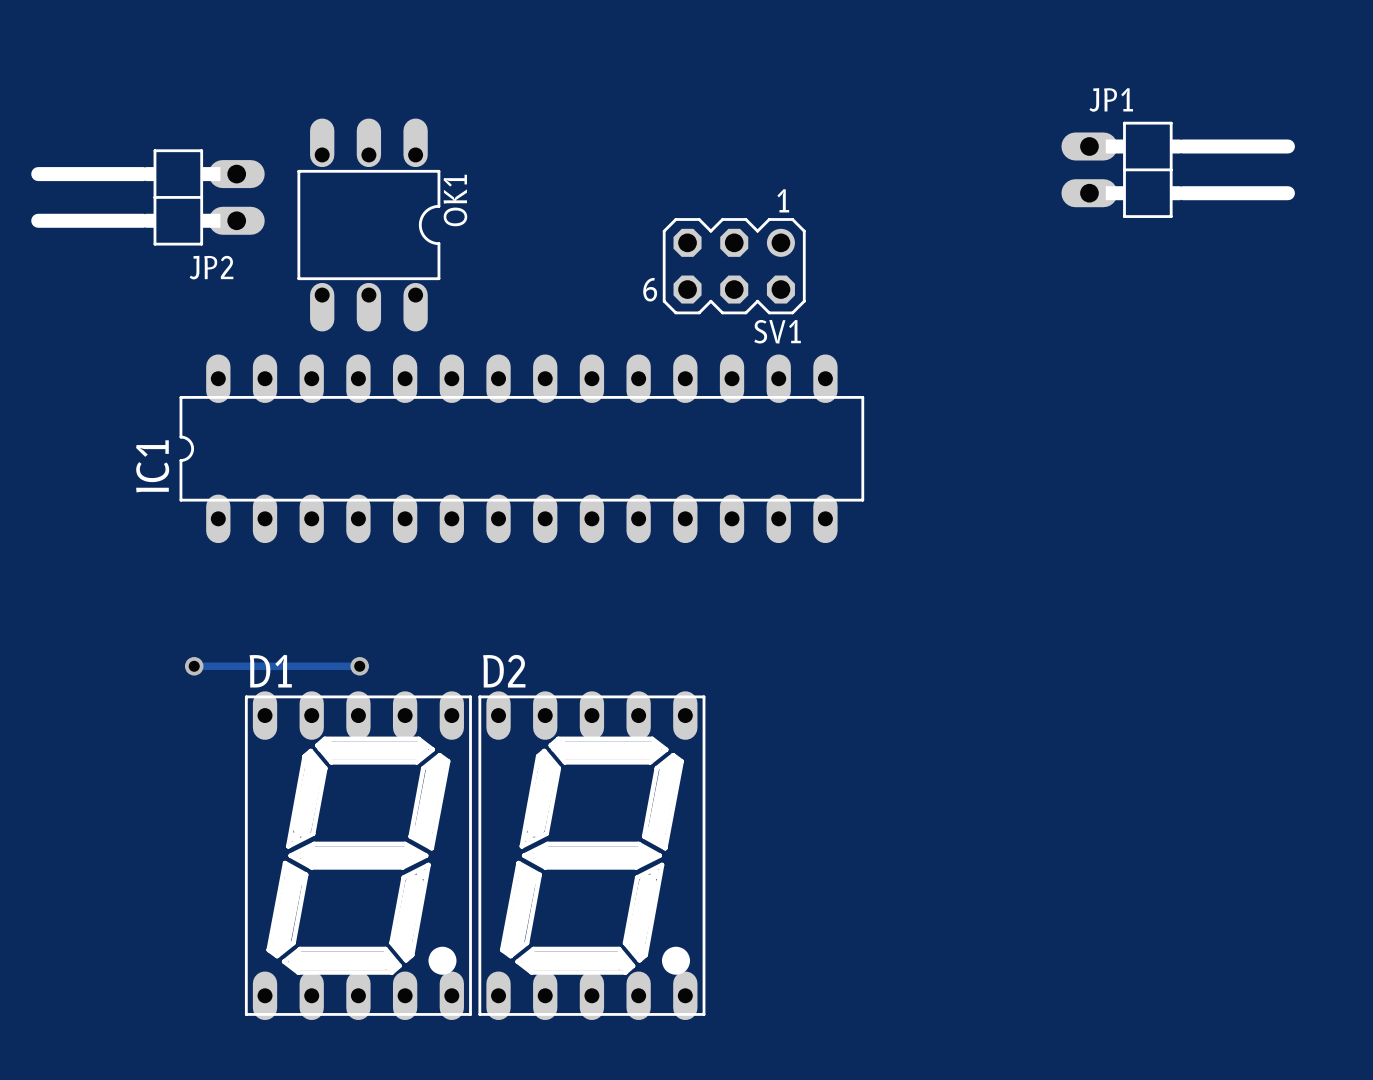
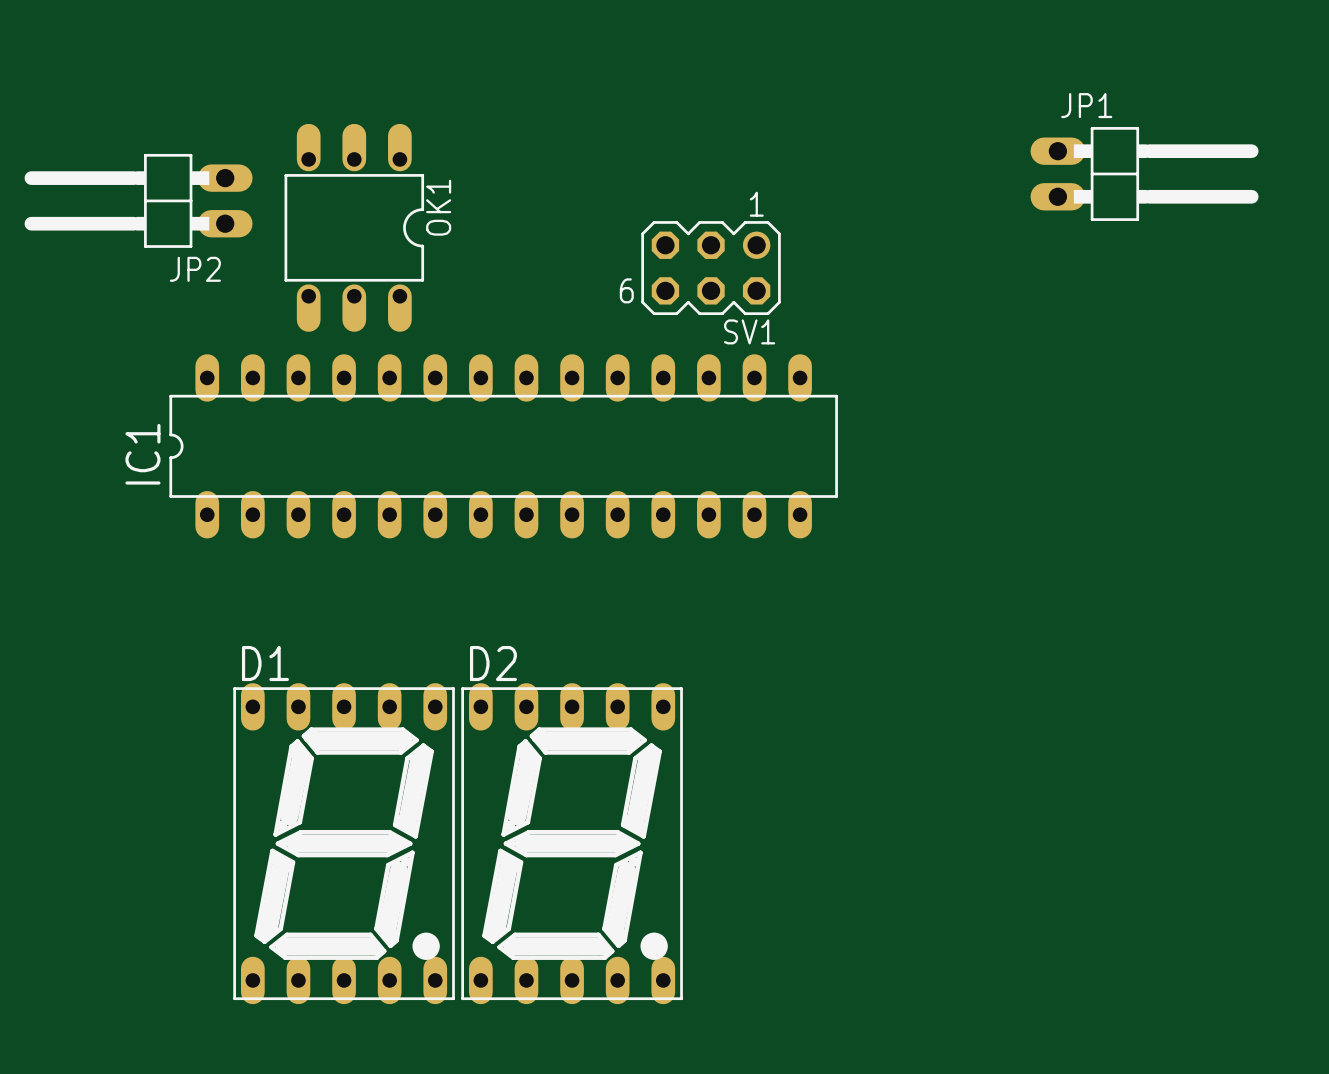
track: (194, 666) (359, 666) -> none
via: (194, 666) -> none
via: (359, 666) -> none

